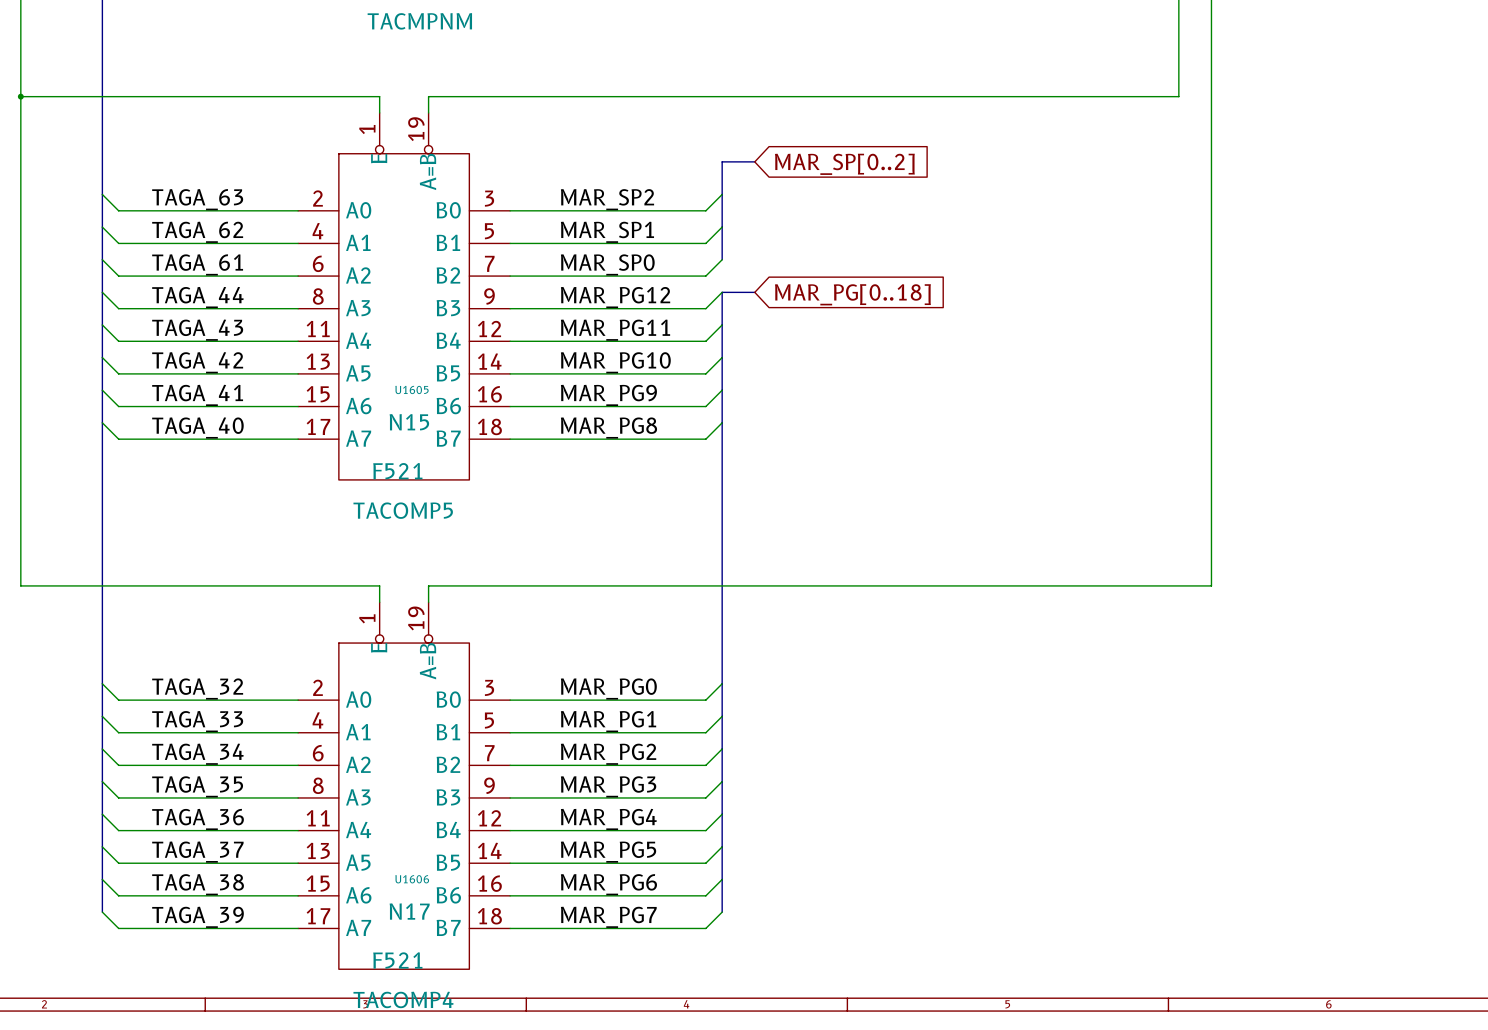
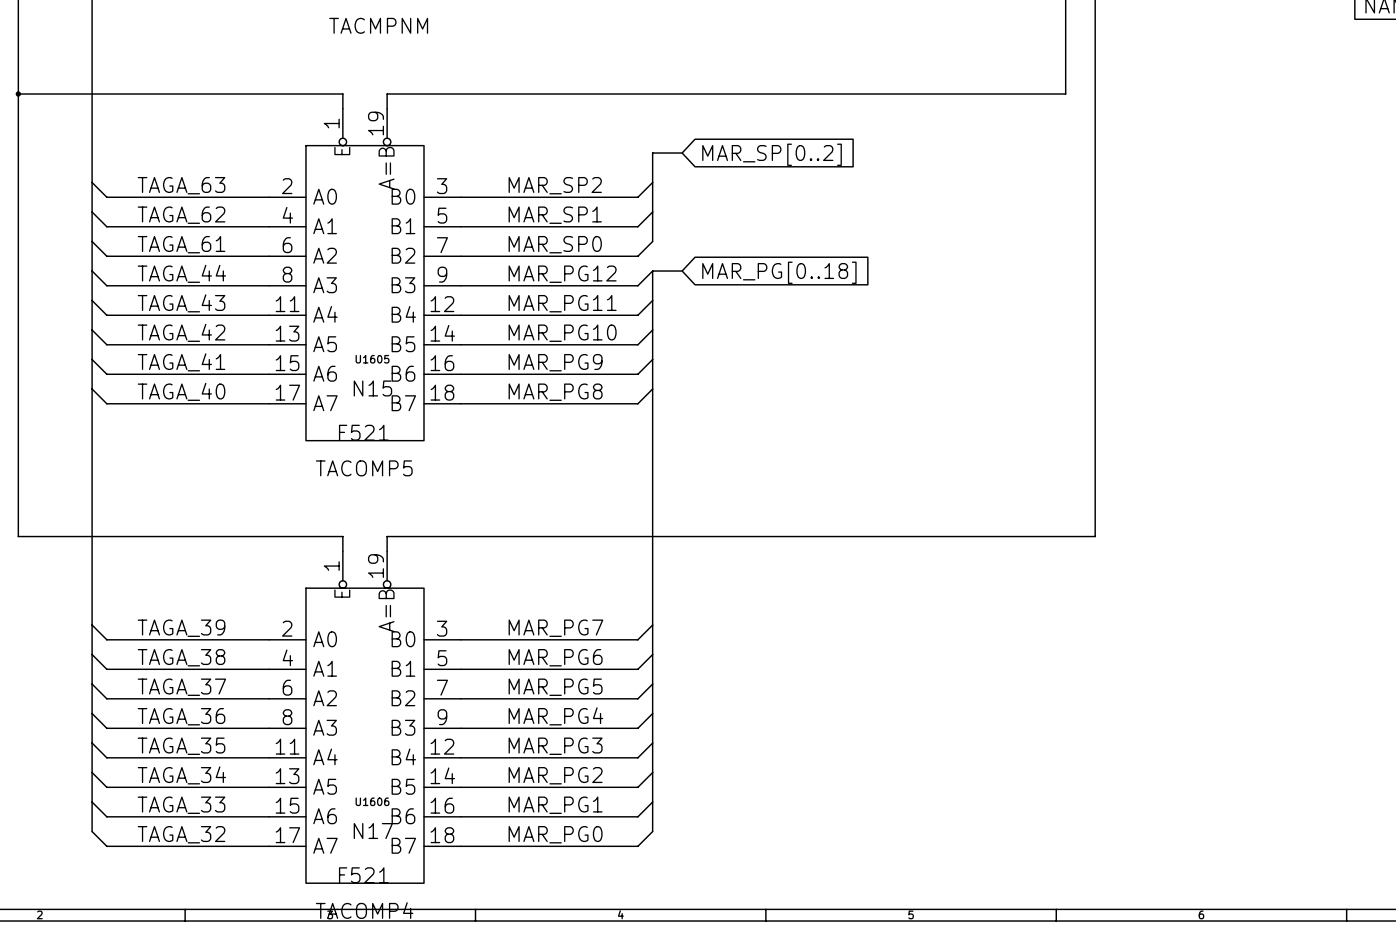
label: TAGA_32 (197, 688) -> TAGA_39 (181, 628)
label: MAR_PG0 (608, 688) -> MAR_PG7 (555, 628)
label: TAGA_33 (197, 721) -> TAGA_38 (181, 657)
label: MAR_PG1 (608, 721) -> MAR_PG6 (555, 657)
label: TAGA_34 (197, 754) -> TAGA_37 (181, 687)
label: MAR_PG2 (608, 754) -> MAR_PG5 (555, 687)
label: TAGA_35 (197, 786) -> TAGA_36 (181, 716)
label: MAR_PG3 (608, 786) -> MAR_PG4 (555, 716)
label: TAGA_36 (198, 819) -> TAGA_35 (181, 746)
label: MAR_PG4 (608, 819) -> MAR_PG3 (555, 746)
label: TAGA_37 (197, 852) -> TAGA_34 (181, 775)
label: MAR_PG5 (608, 852) -> MAR_PG2 (555, 775)
label: TAGA_38 (198, 884) -> TAGA_33 (181, 805)
label: MAR_PG6 (608, 884) -> MAR_PG1 (555, 805)
label: TAGA_39 (198, 917) -> TAGA_32 (181, 834)
label: MAR_PG7 (608, 917) -> MAR_PG0 (555, 834)

